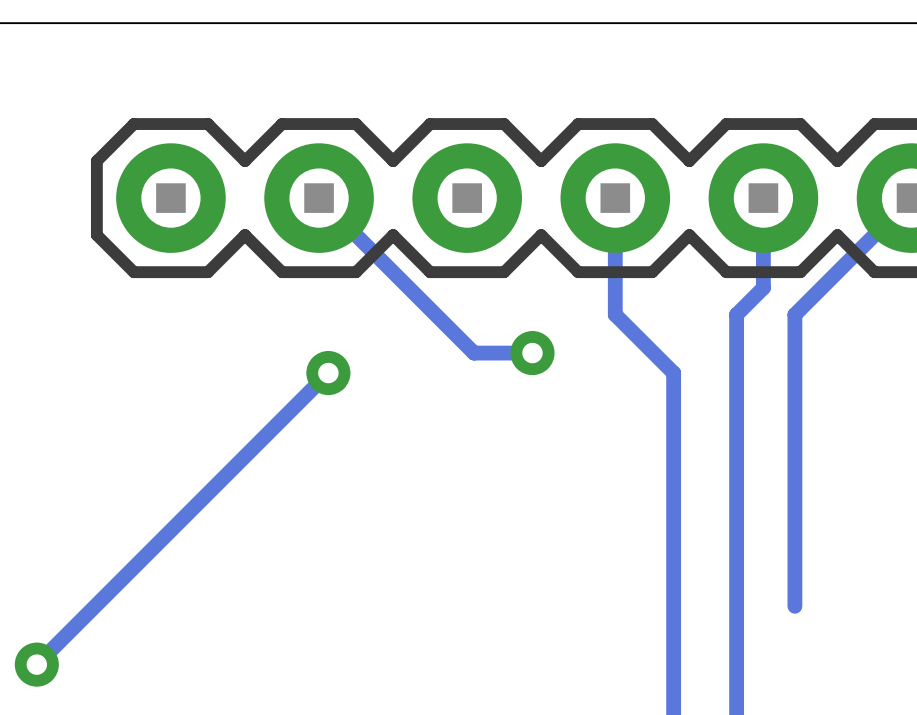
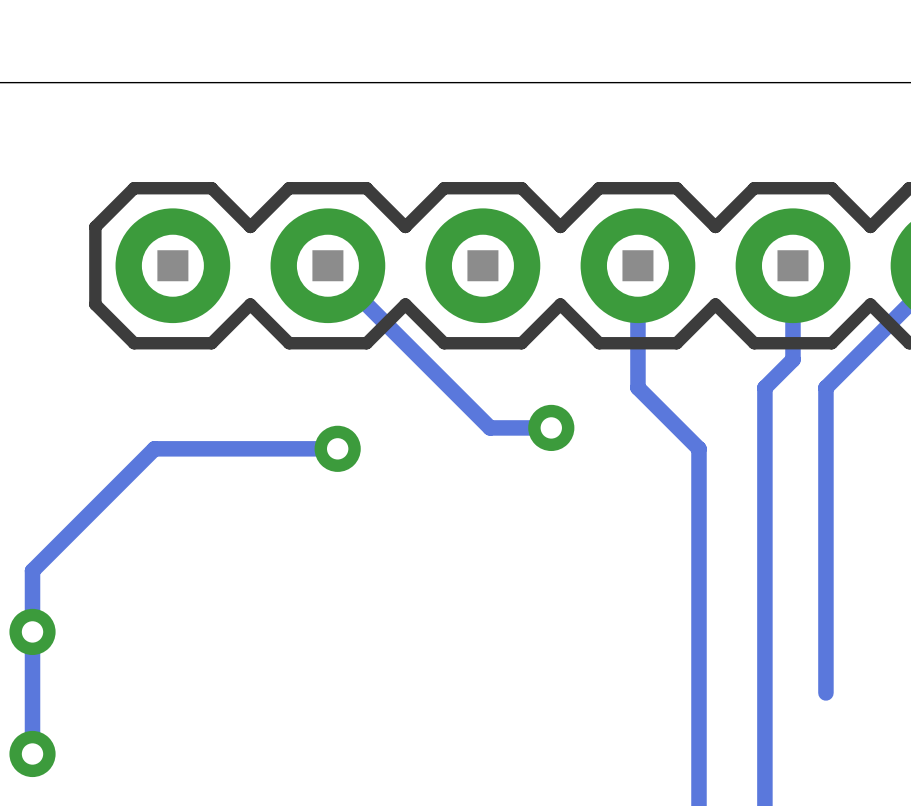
track: (328, 373) (36, 664) -> (337, 448) (154, 448) (32, 570) (32, 753)
via: none -> (32, 631)

